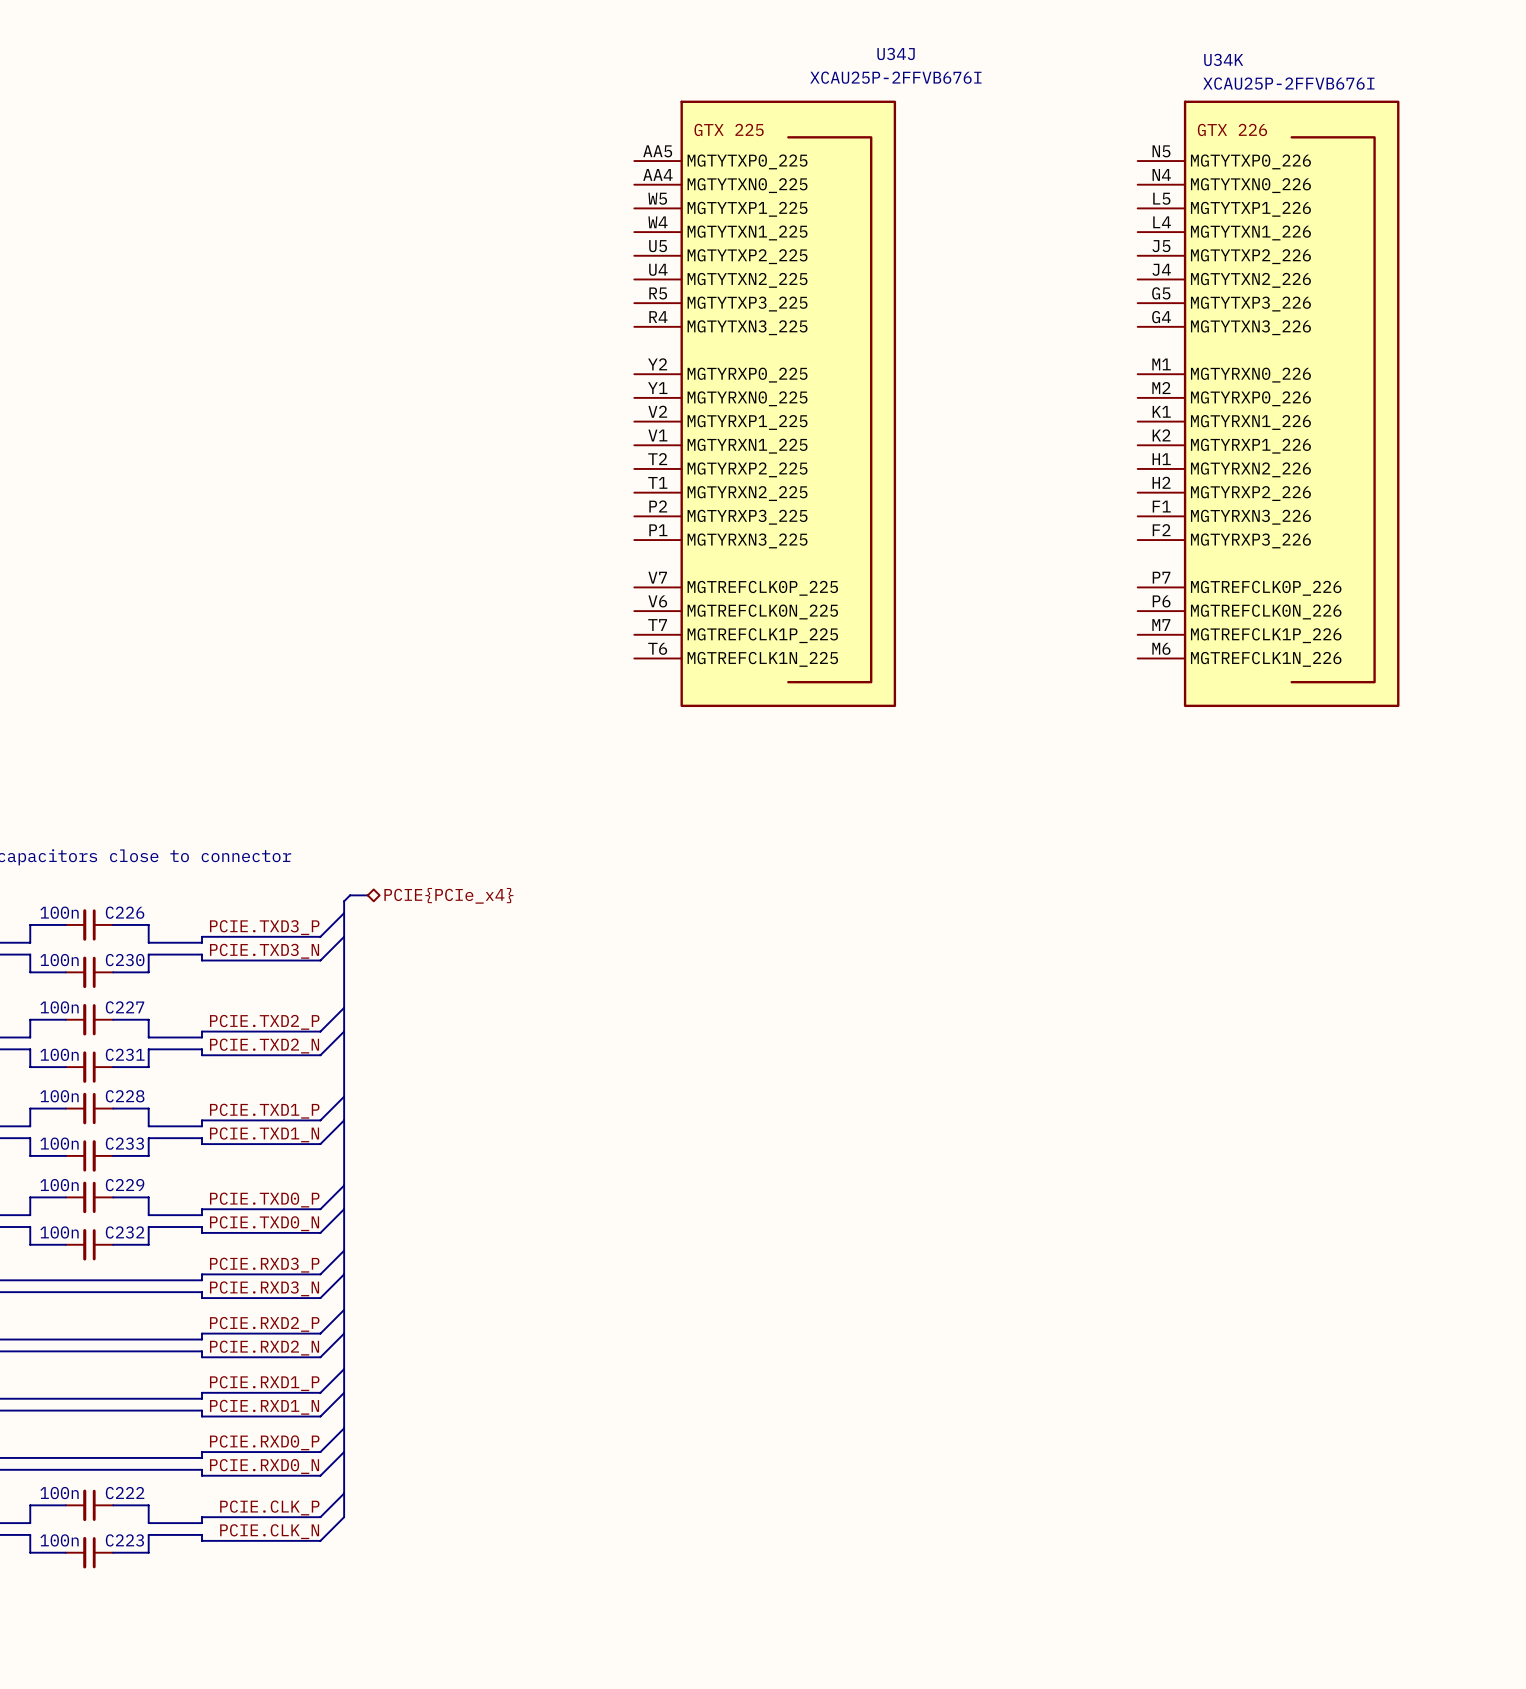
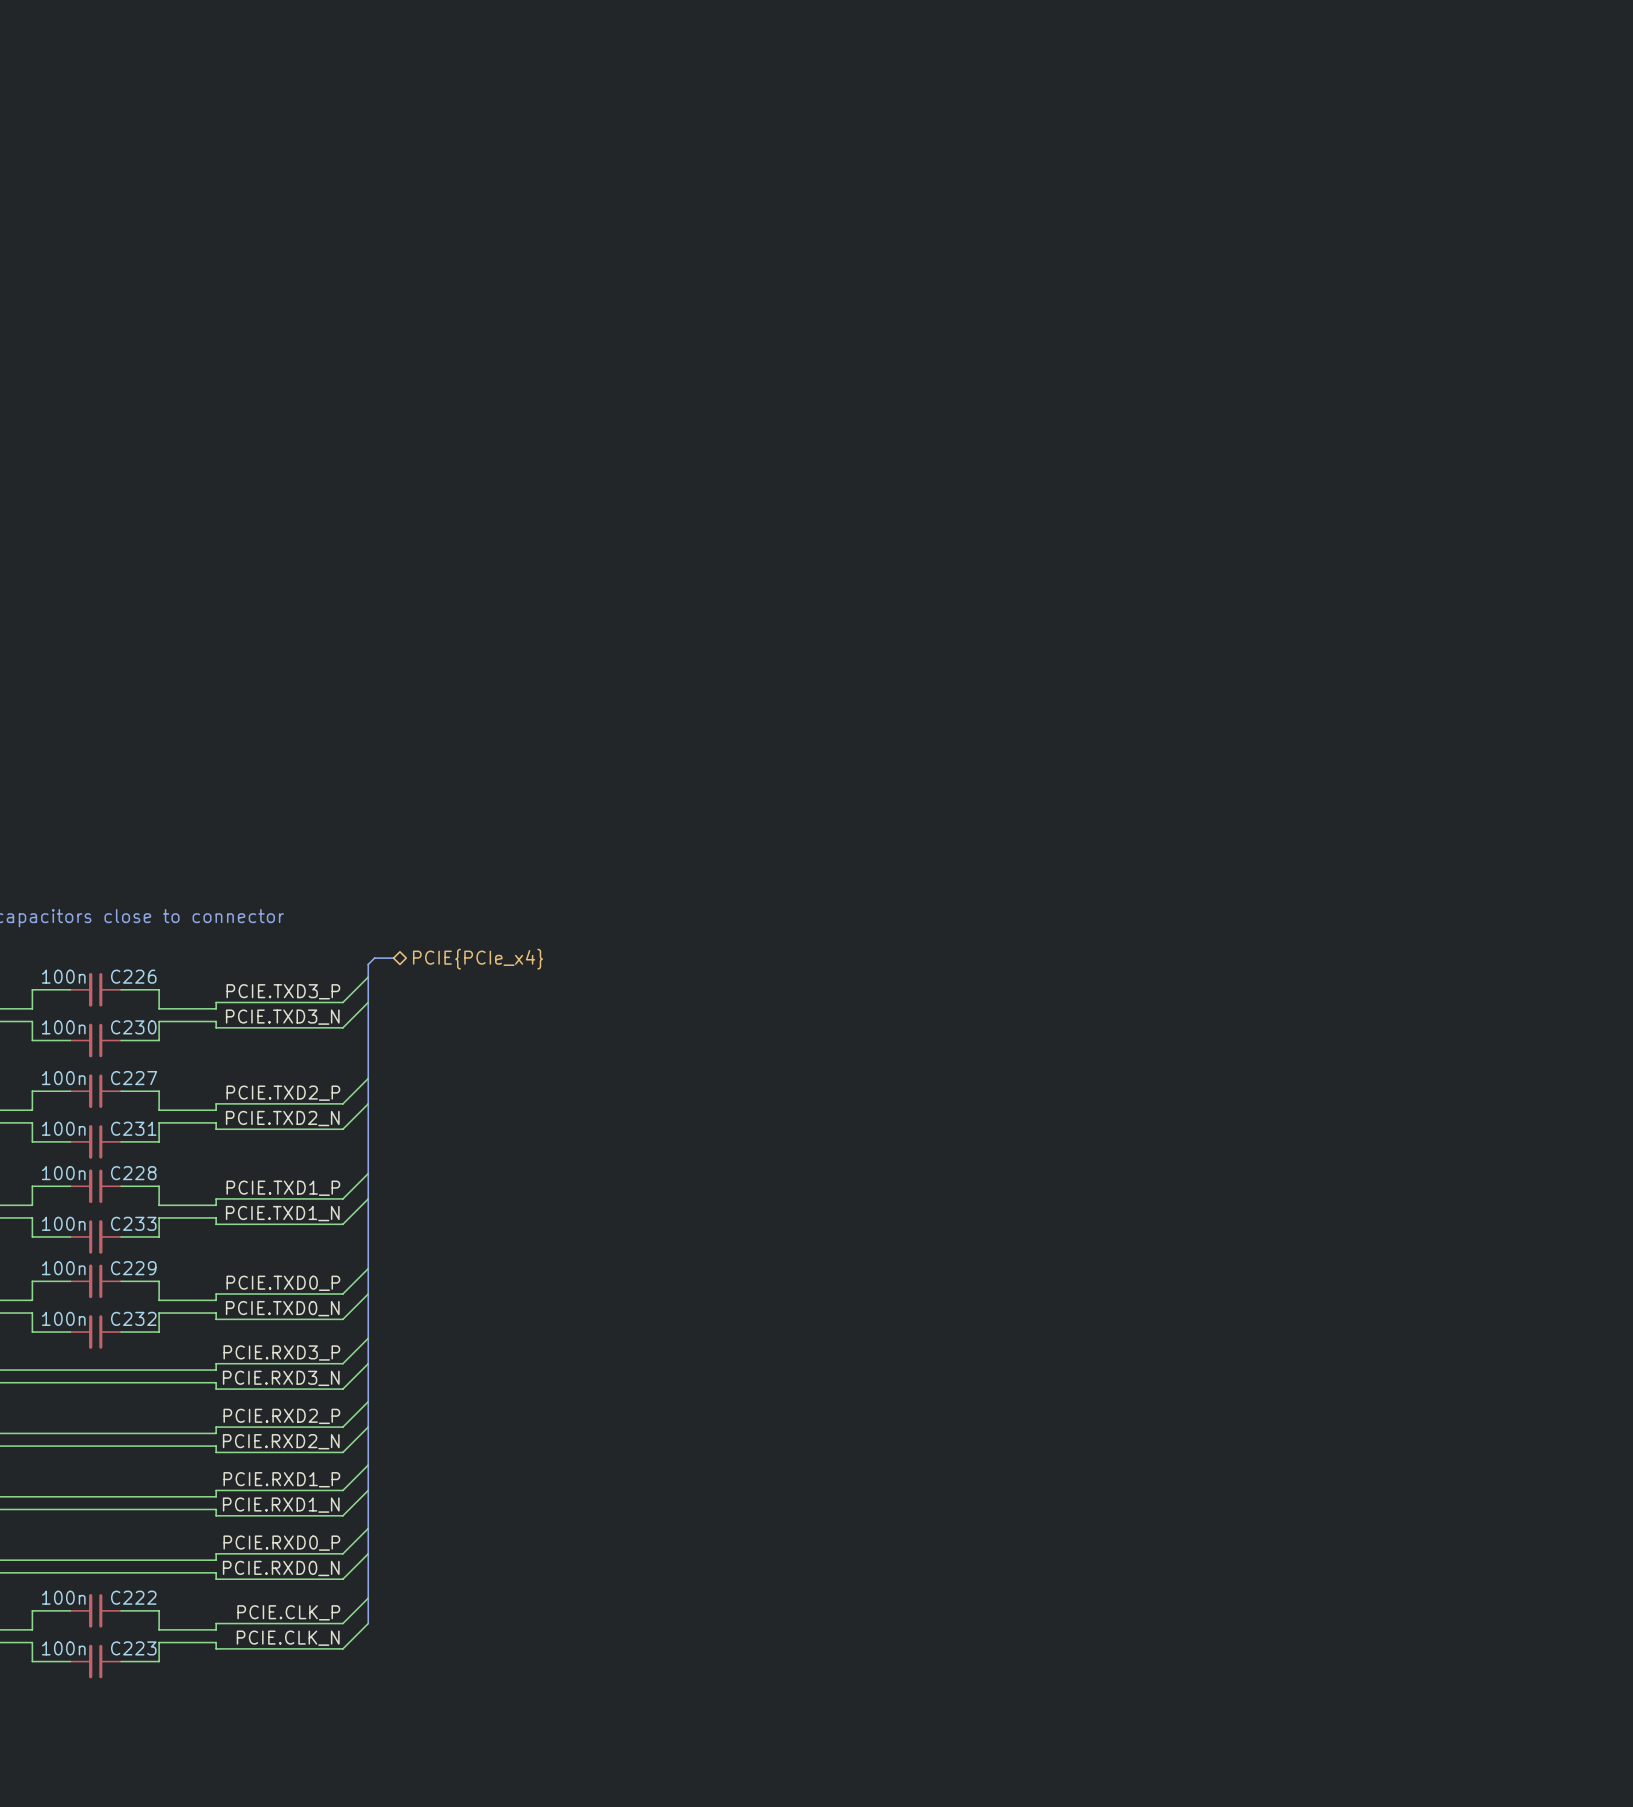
U34J: (765, 403) -> none
U34K: (1268, 403) -> none

